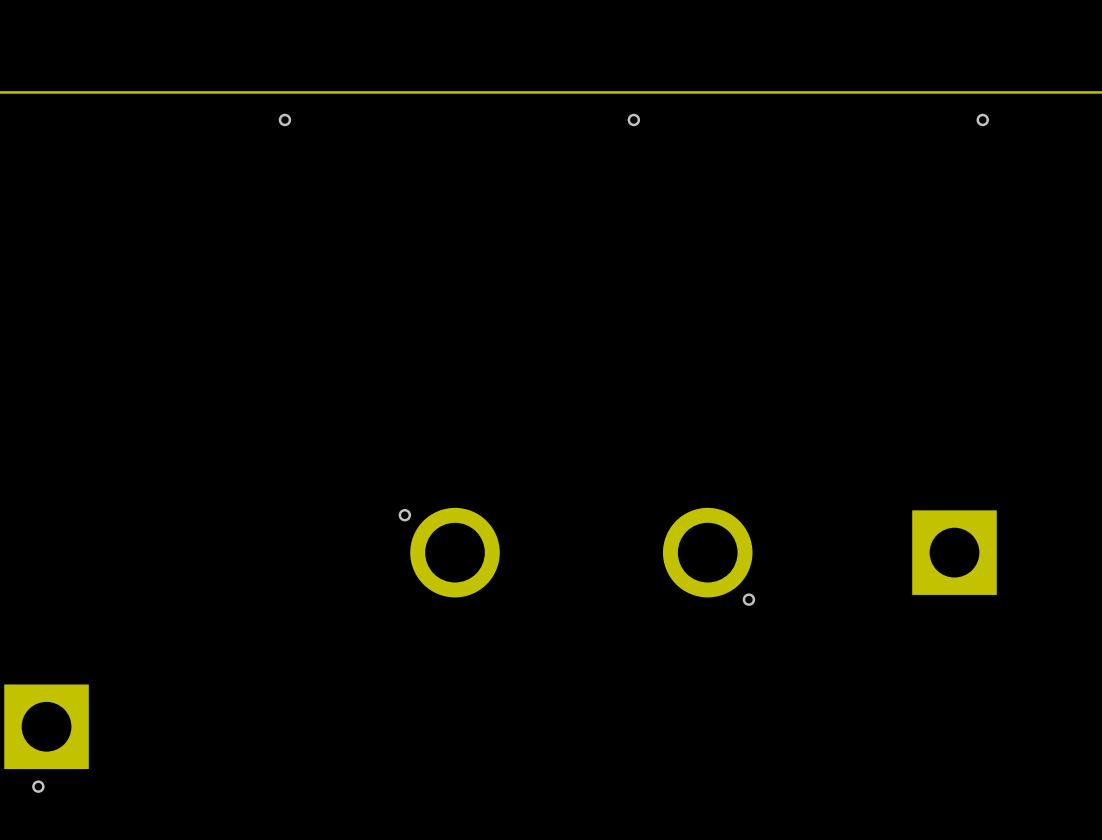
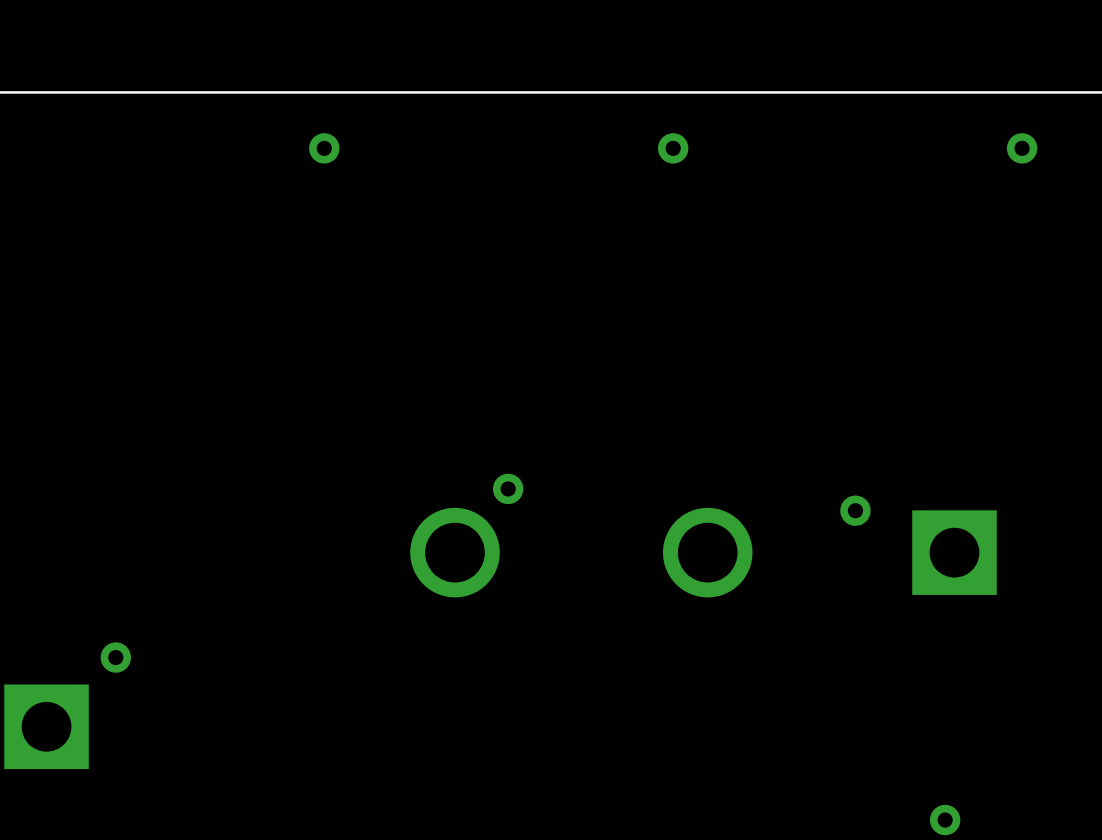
via: (284, 119) -> none
via: (633, 119) -> none
via: (982, 119) -> none
via: none -> (324, 148)
via: none -> (673, 148)
via: none -> (1022, 148)
via: none -> (508, 488)
via: none -> (855, 510)
via: (404, 515) -> none
via: (748, 599) -> none
via: none -> (115, 657)
via: (38, 786) -> none
via: none -> (945, 820)

